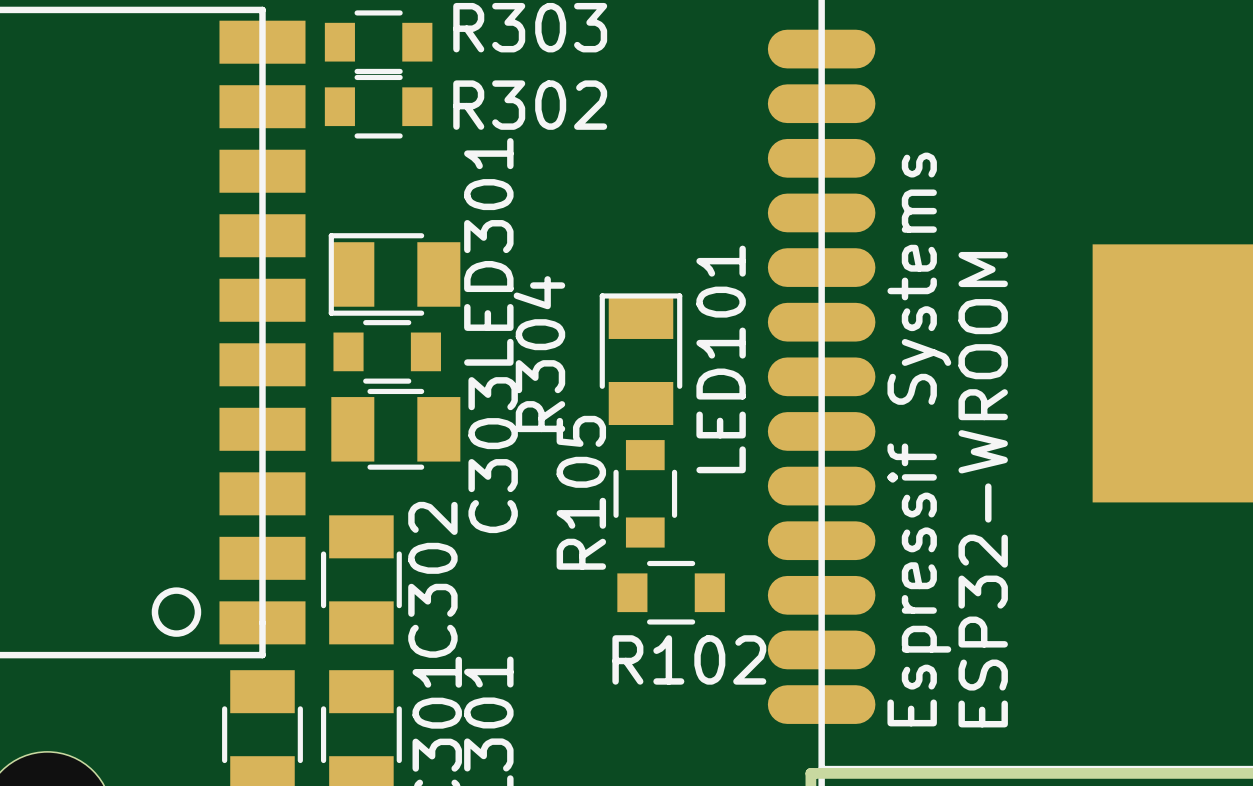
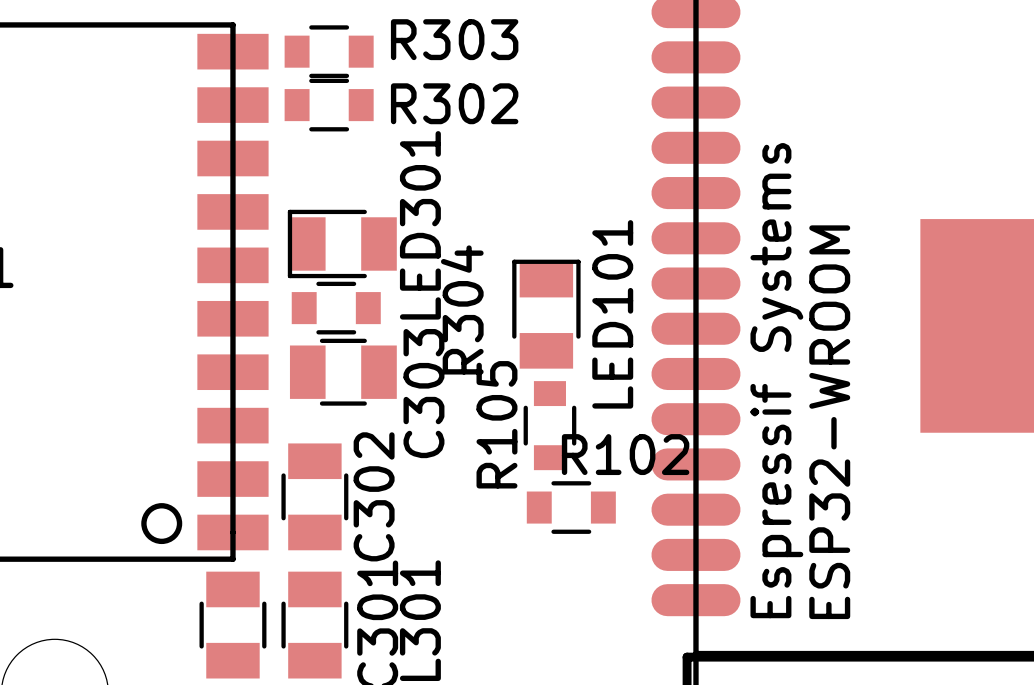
R102 name position: R102 (689, 659) -> R102 (625, 454)

